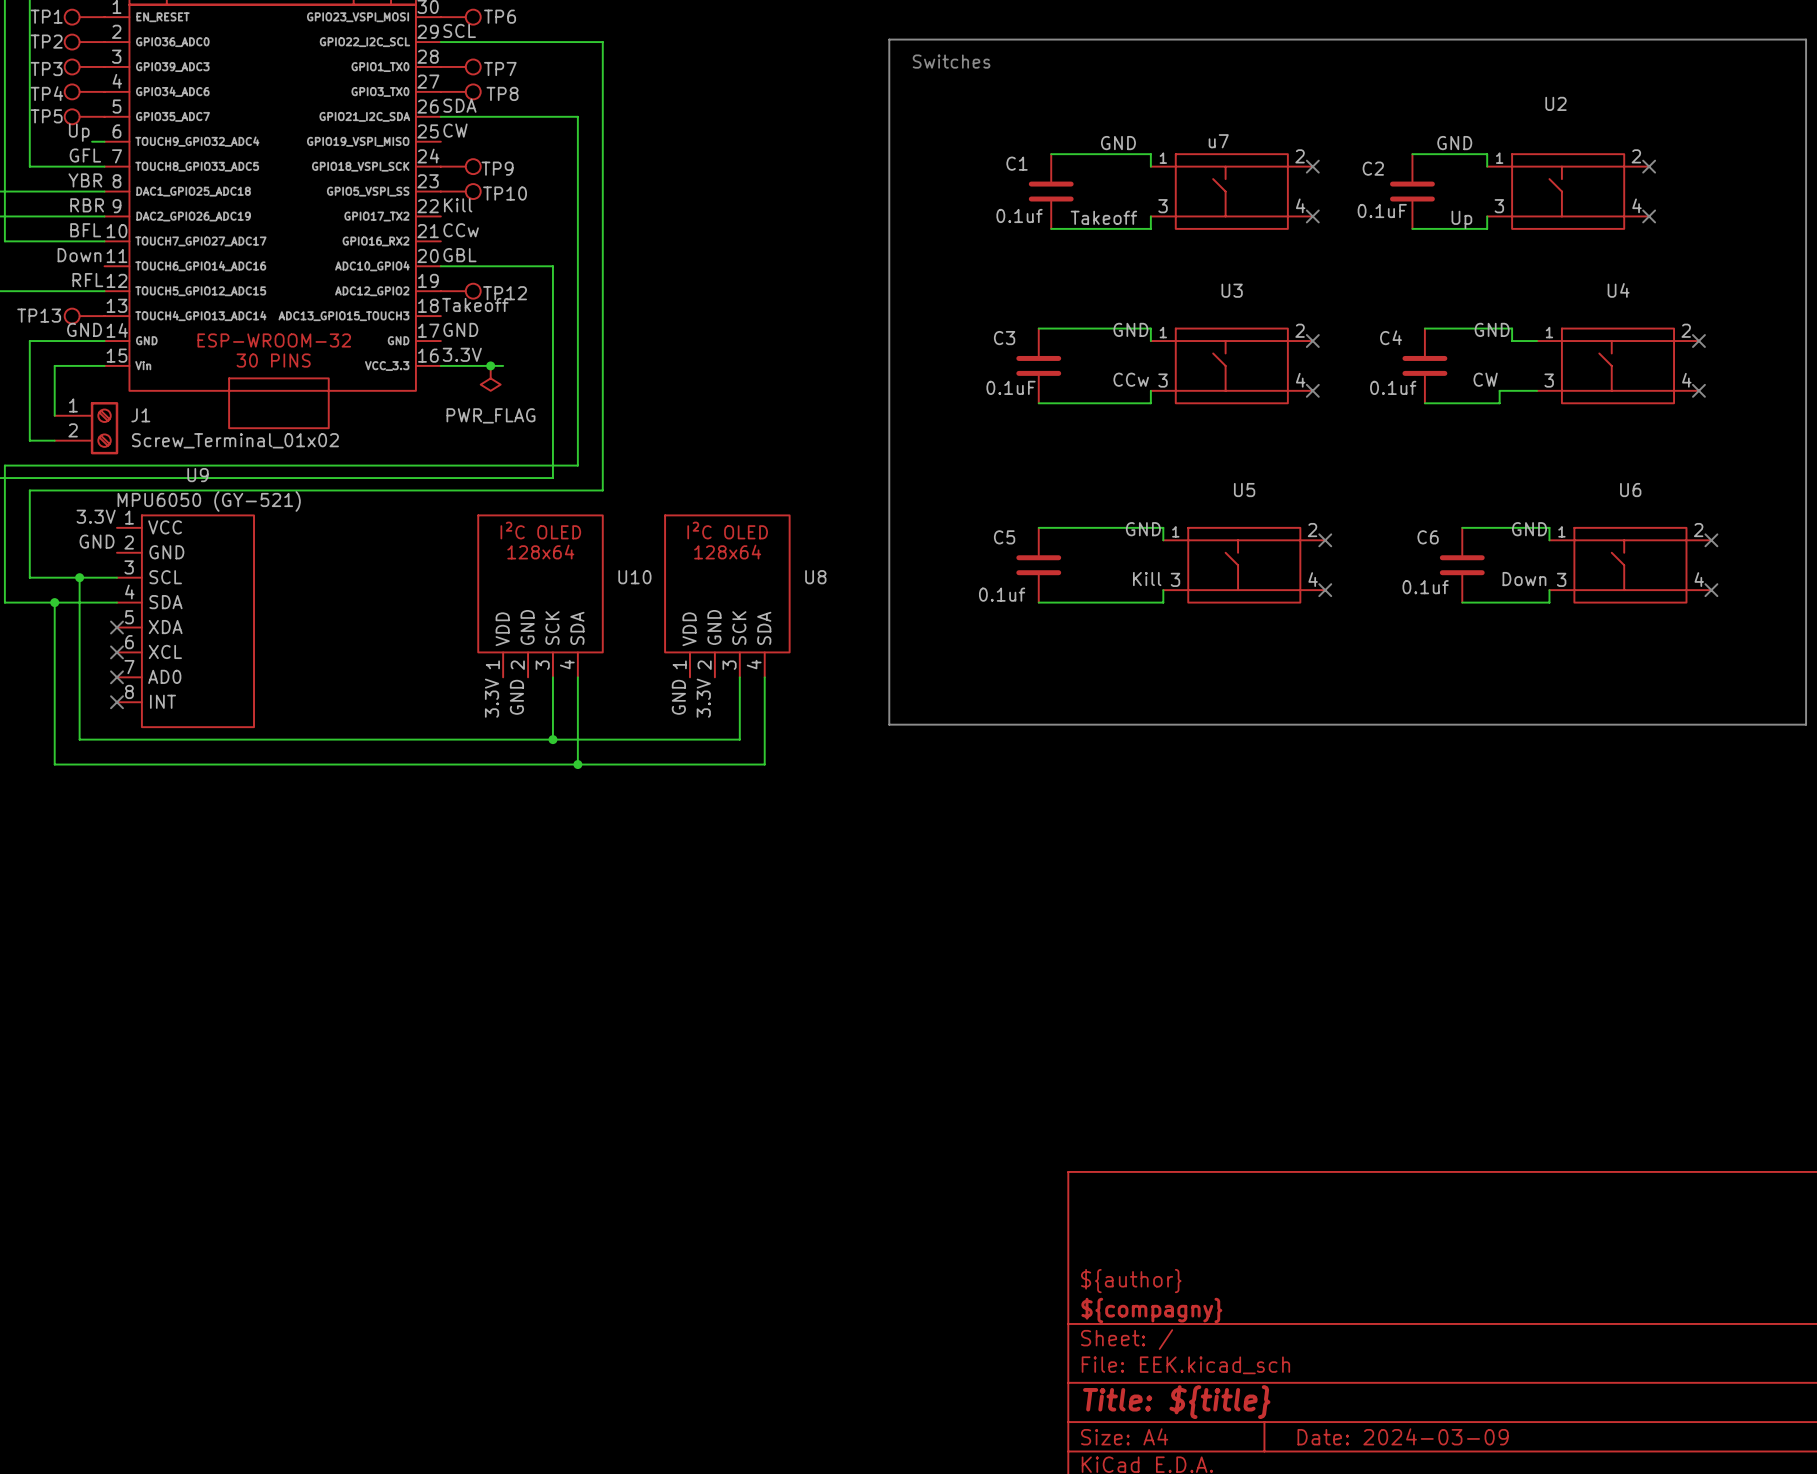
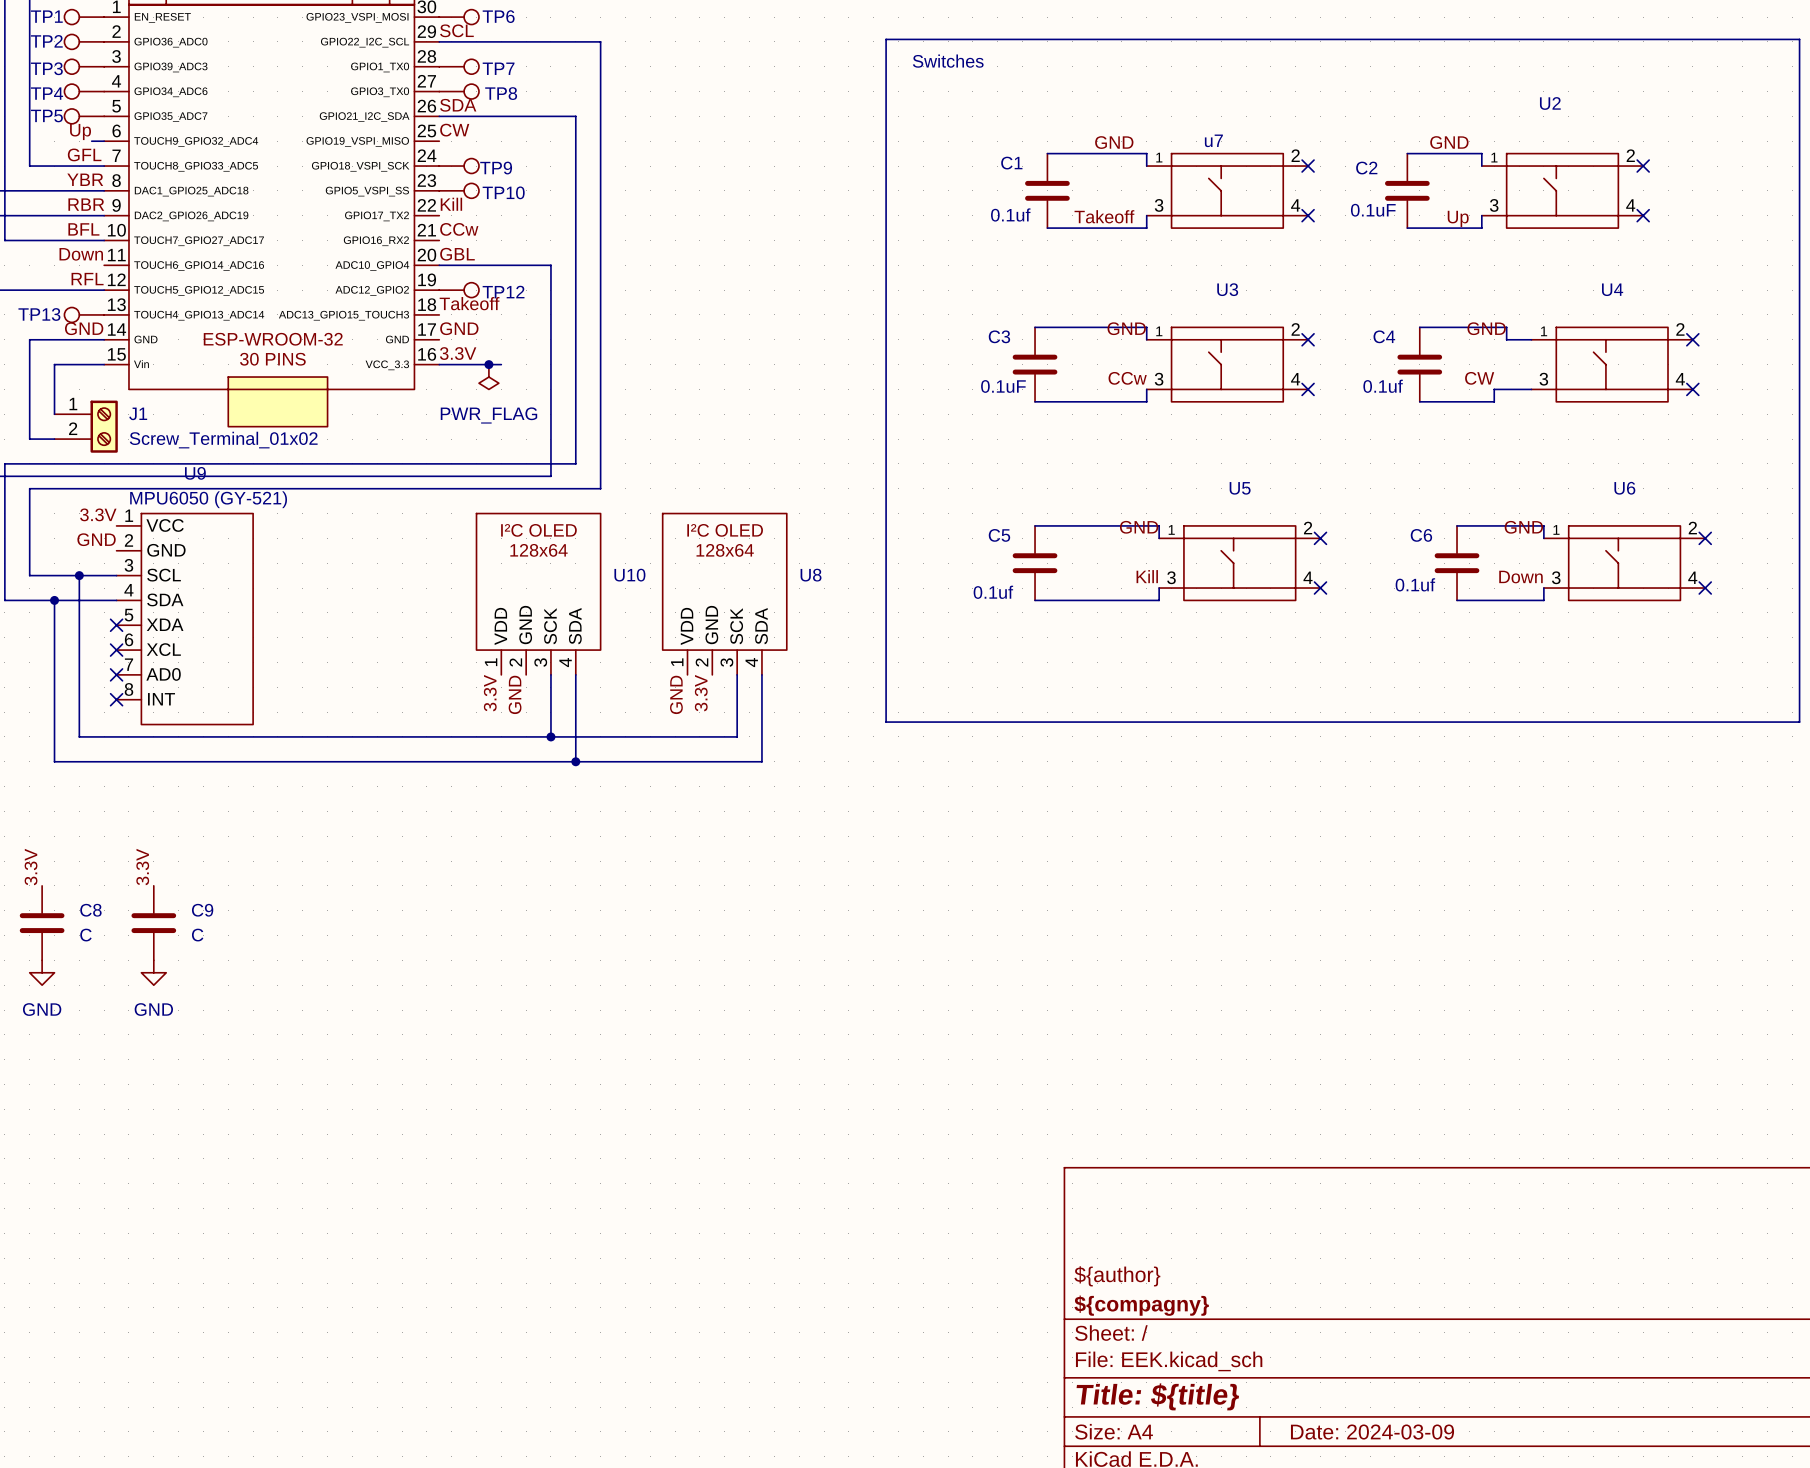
label: none -> 3.3V (31, 867)
label: none -> 3.3V (142, 867)
C8: none -> C (42, 923)
C9: none -> C (153, 923)
power symbol: none -> GND (42, 972)
power symbol: none -> GND (153, 972)

